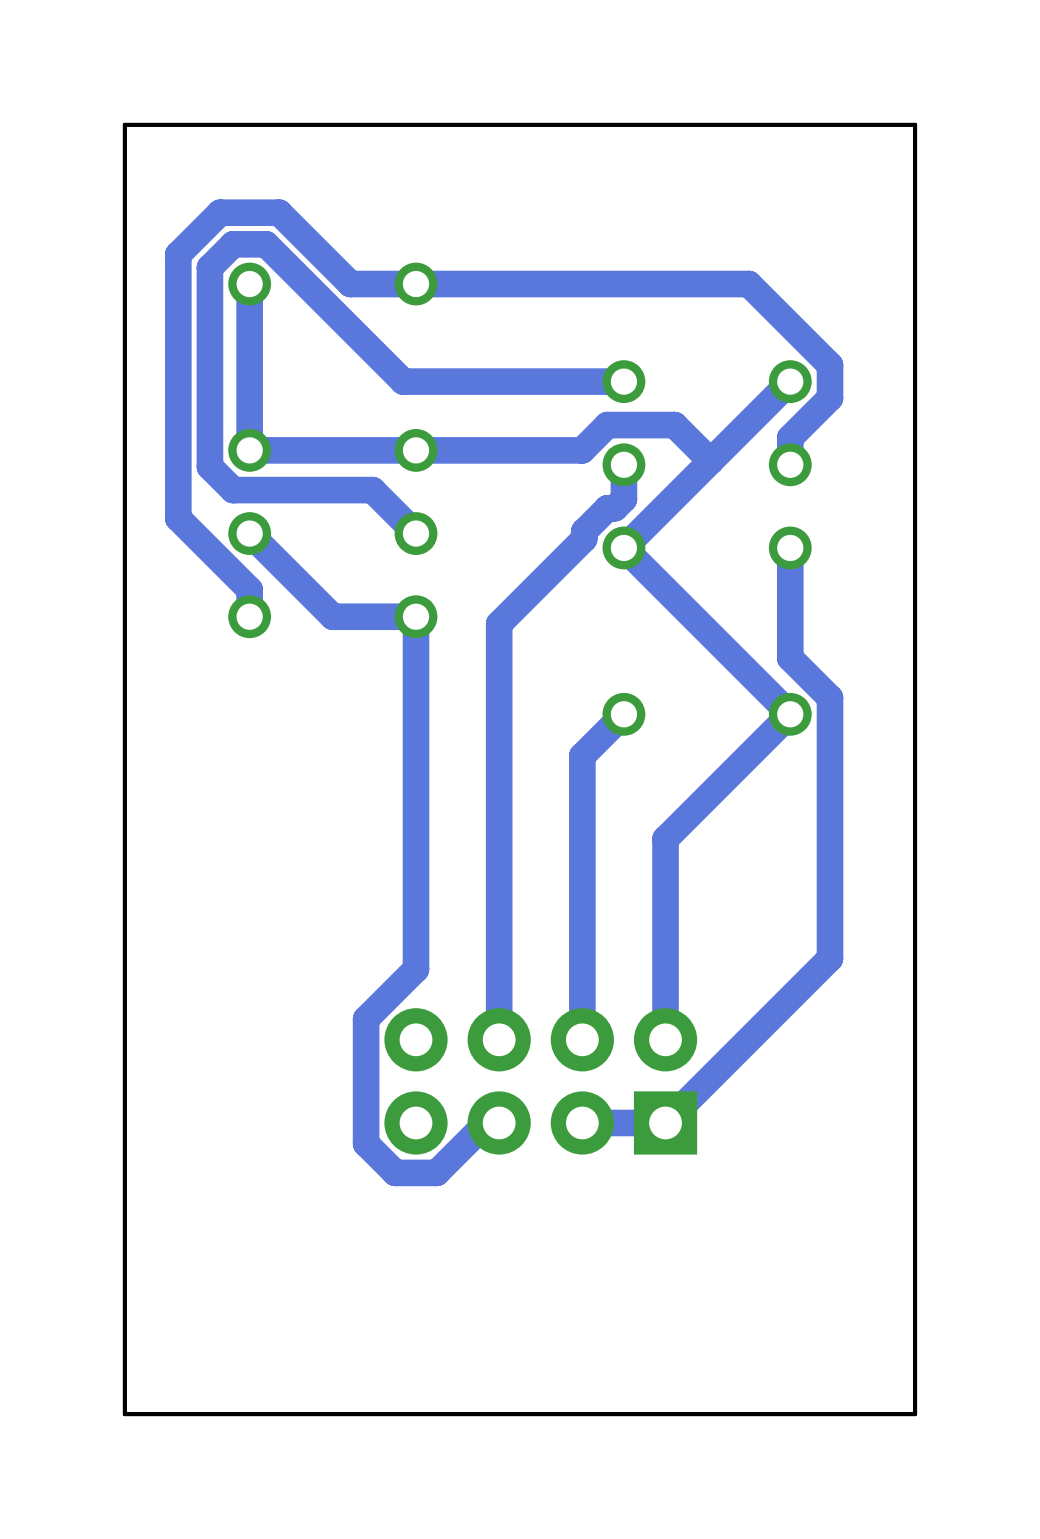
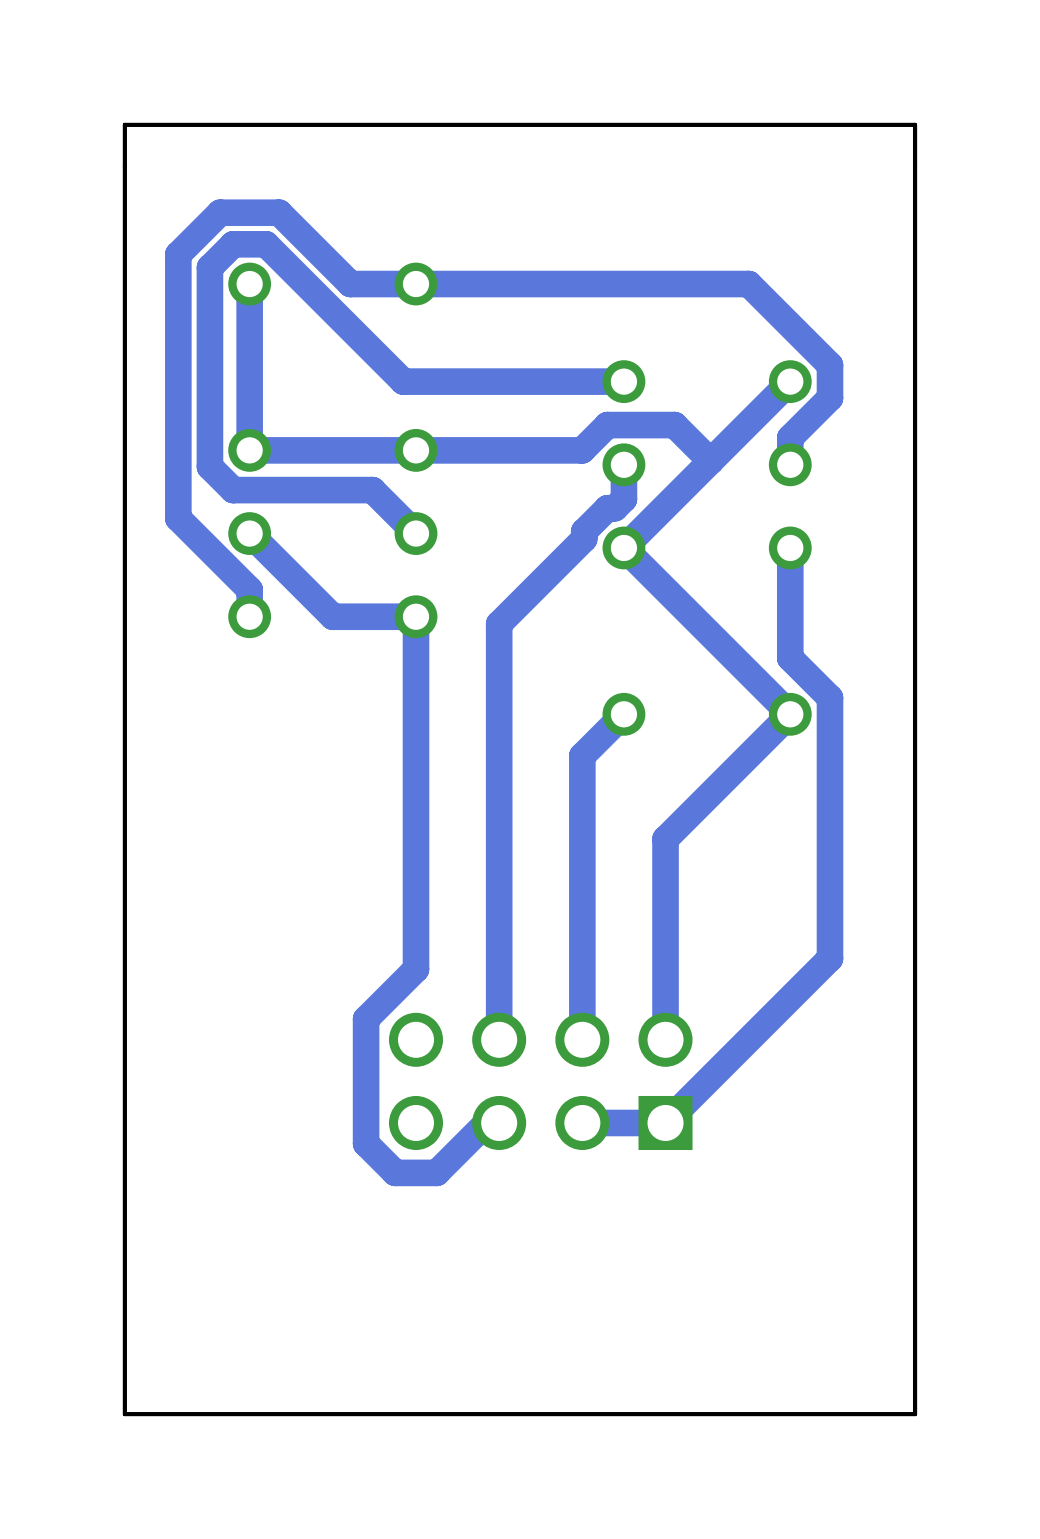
part footprint: [384, 1008, 698, 1155] -> [388, 1012, 693, 1151]

